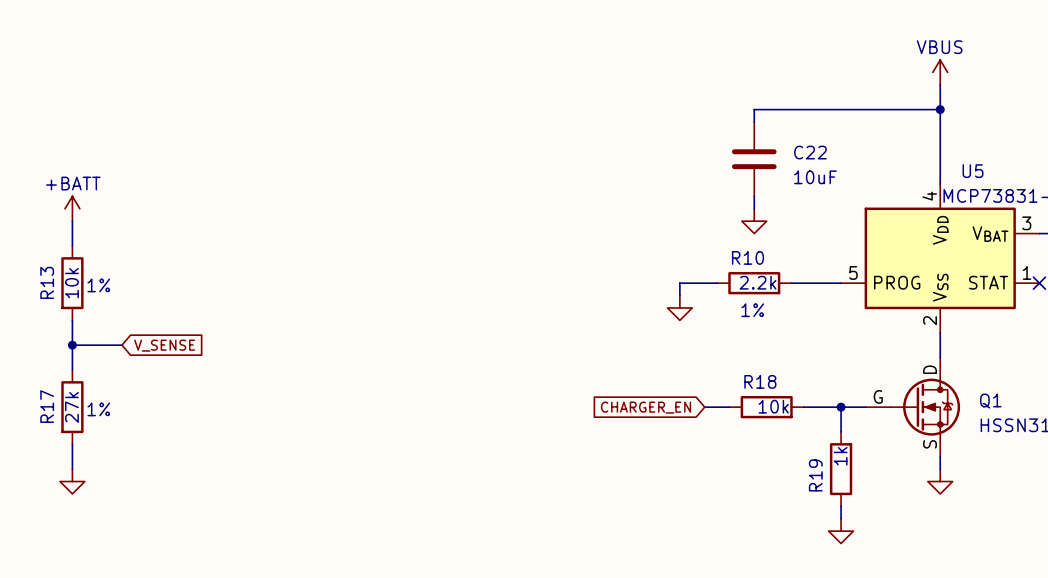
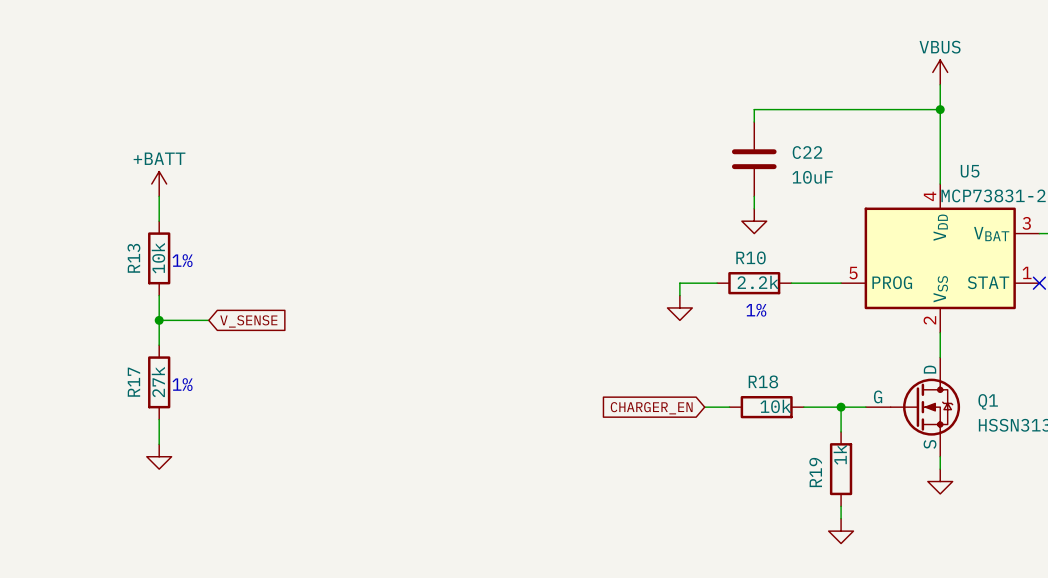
power symbol position: +BATT (72, 208) -> +BATT (159, 183)
wire: (72, 221) (72, 245) -> (159, 196) (159, 221)
text: none -> 1% (182, 260)
R13 position: (72, 283) -> (159, 258)
text: 1% (98, 285) -> none
wire: (72, 320) (72, 369) -> (159, 295) (159, 345)
junction: none -> (159, 320)
wire: (72, 345) (122, 345) -> (159, 320) (208, 320)
junction: (72, 345) -> none
global label position: V_SENSE (164, 345) -> V_SENSE (248, 321)
text: none -> 1% (182, 384)
R17 position: (72, 407) -> (159, 382)
text: 1% (98, 409) -> none
wire: (72, 444) (72, 469) -> (159, 419) (159, 444)
power symbol position: (72, 481) -> (159, 456)

